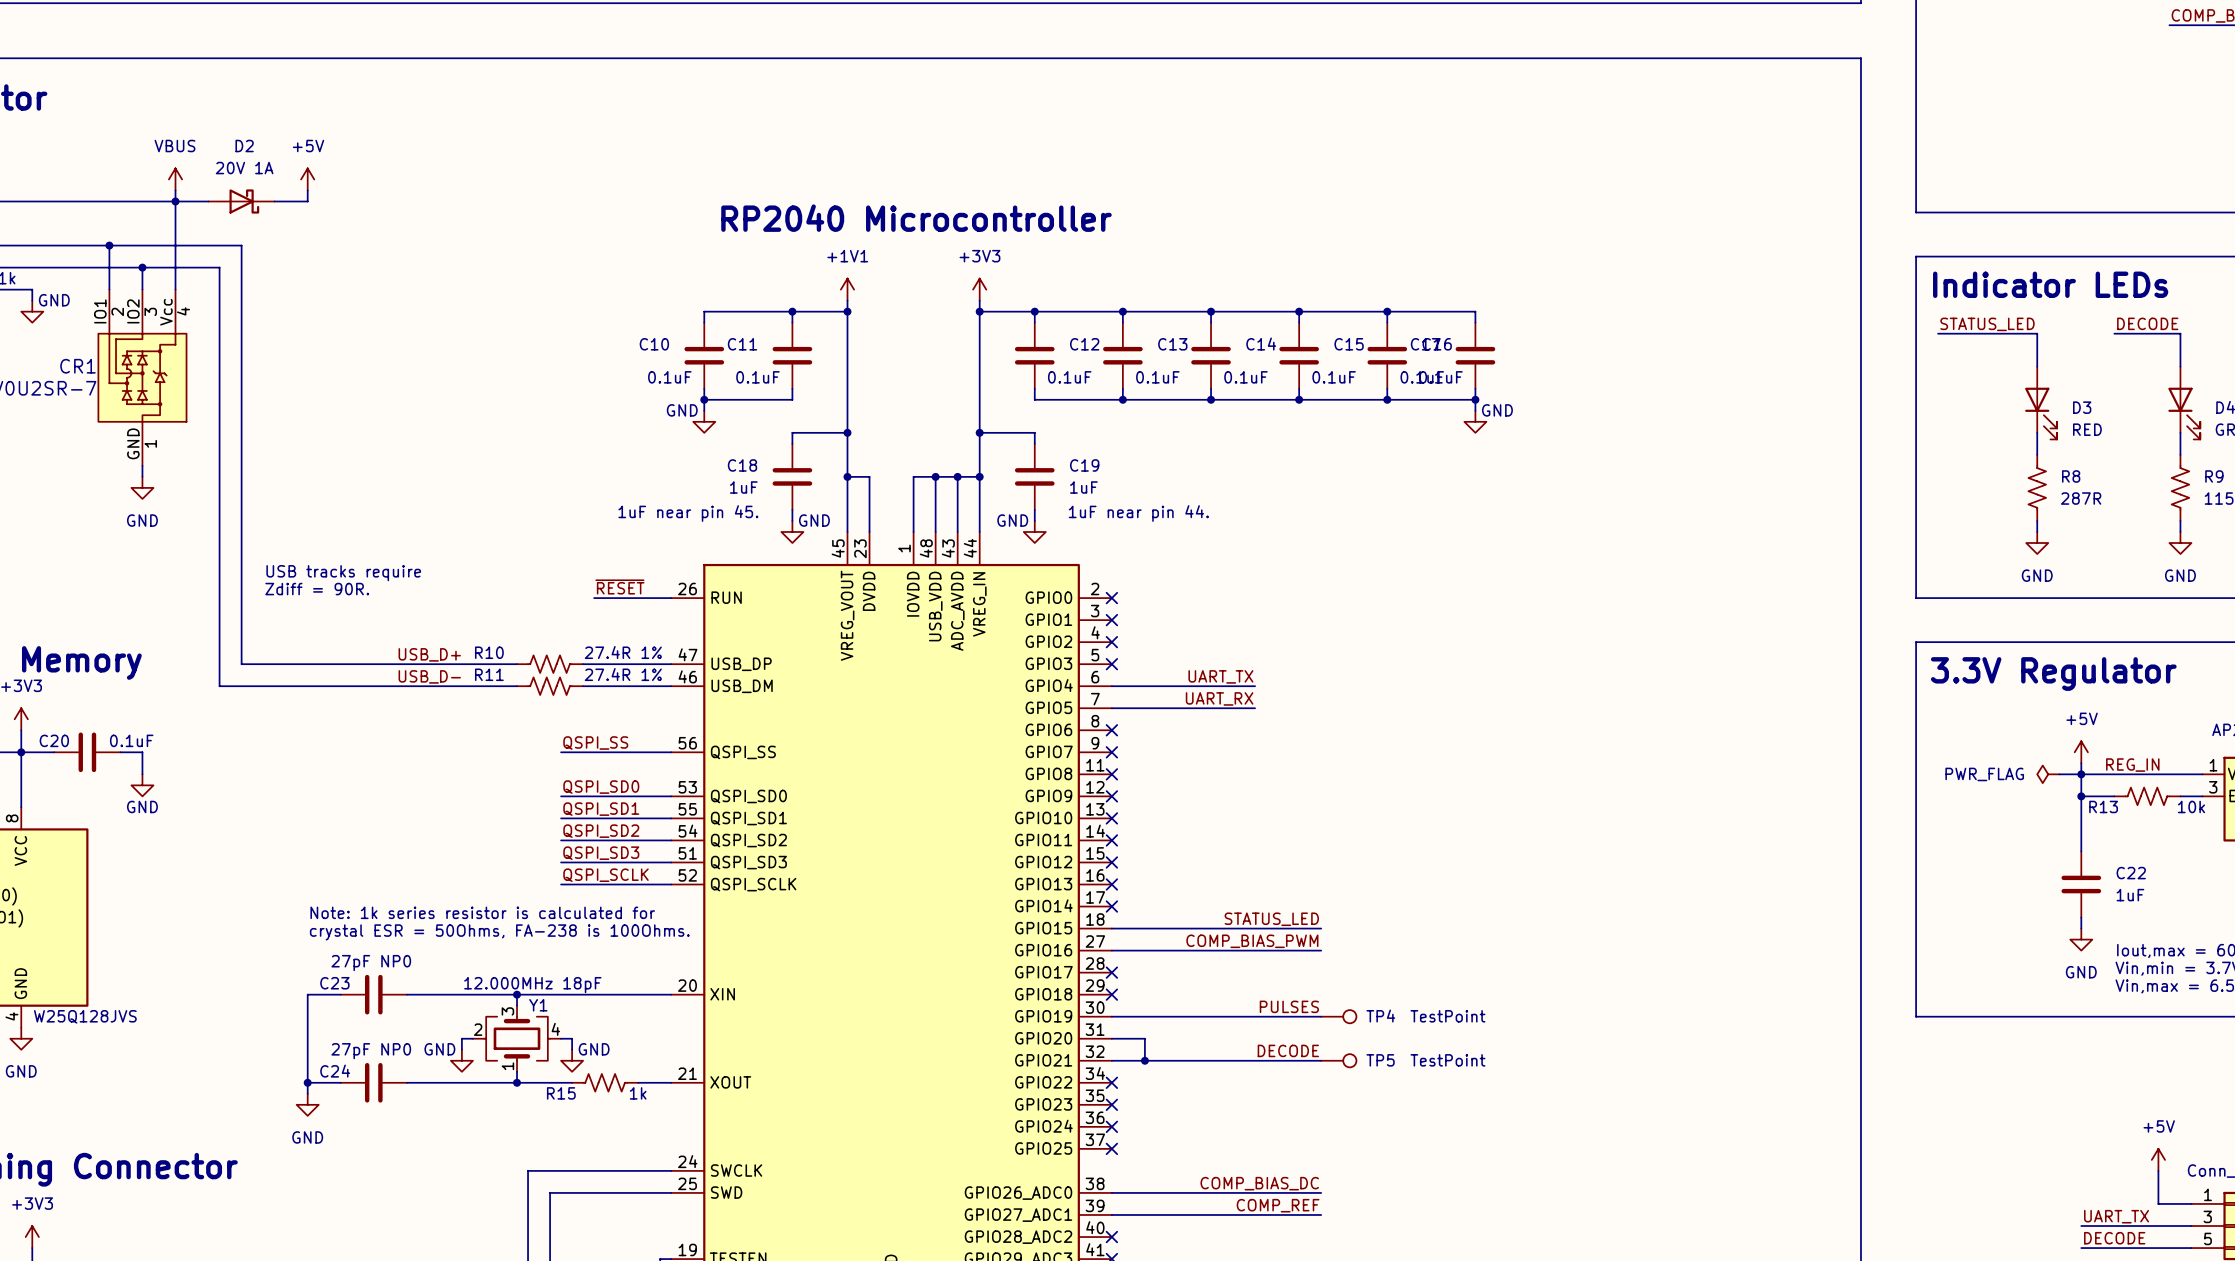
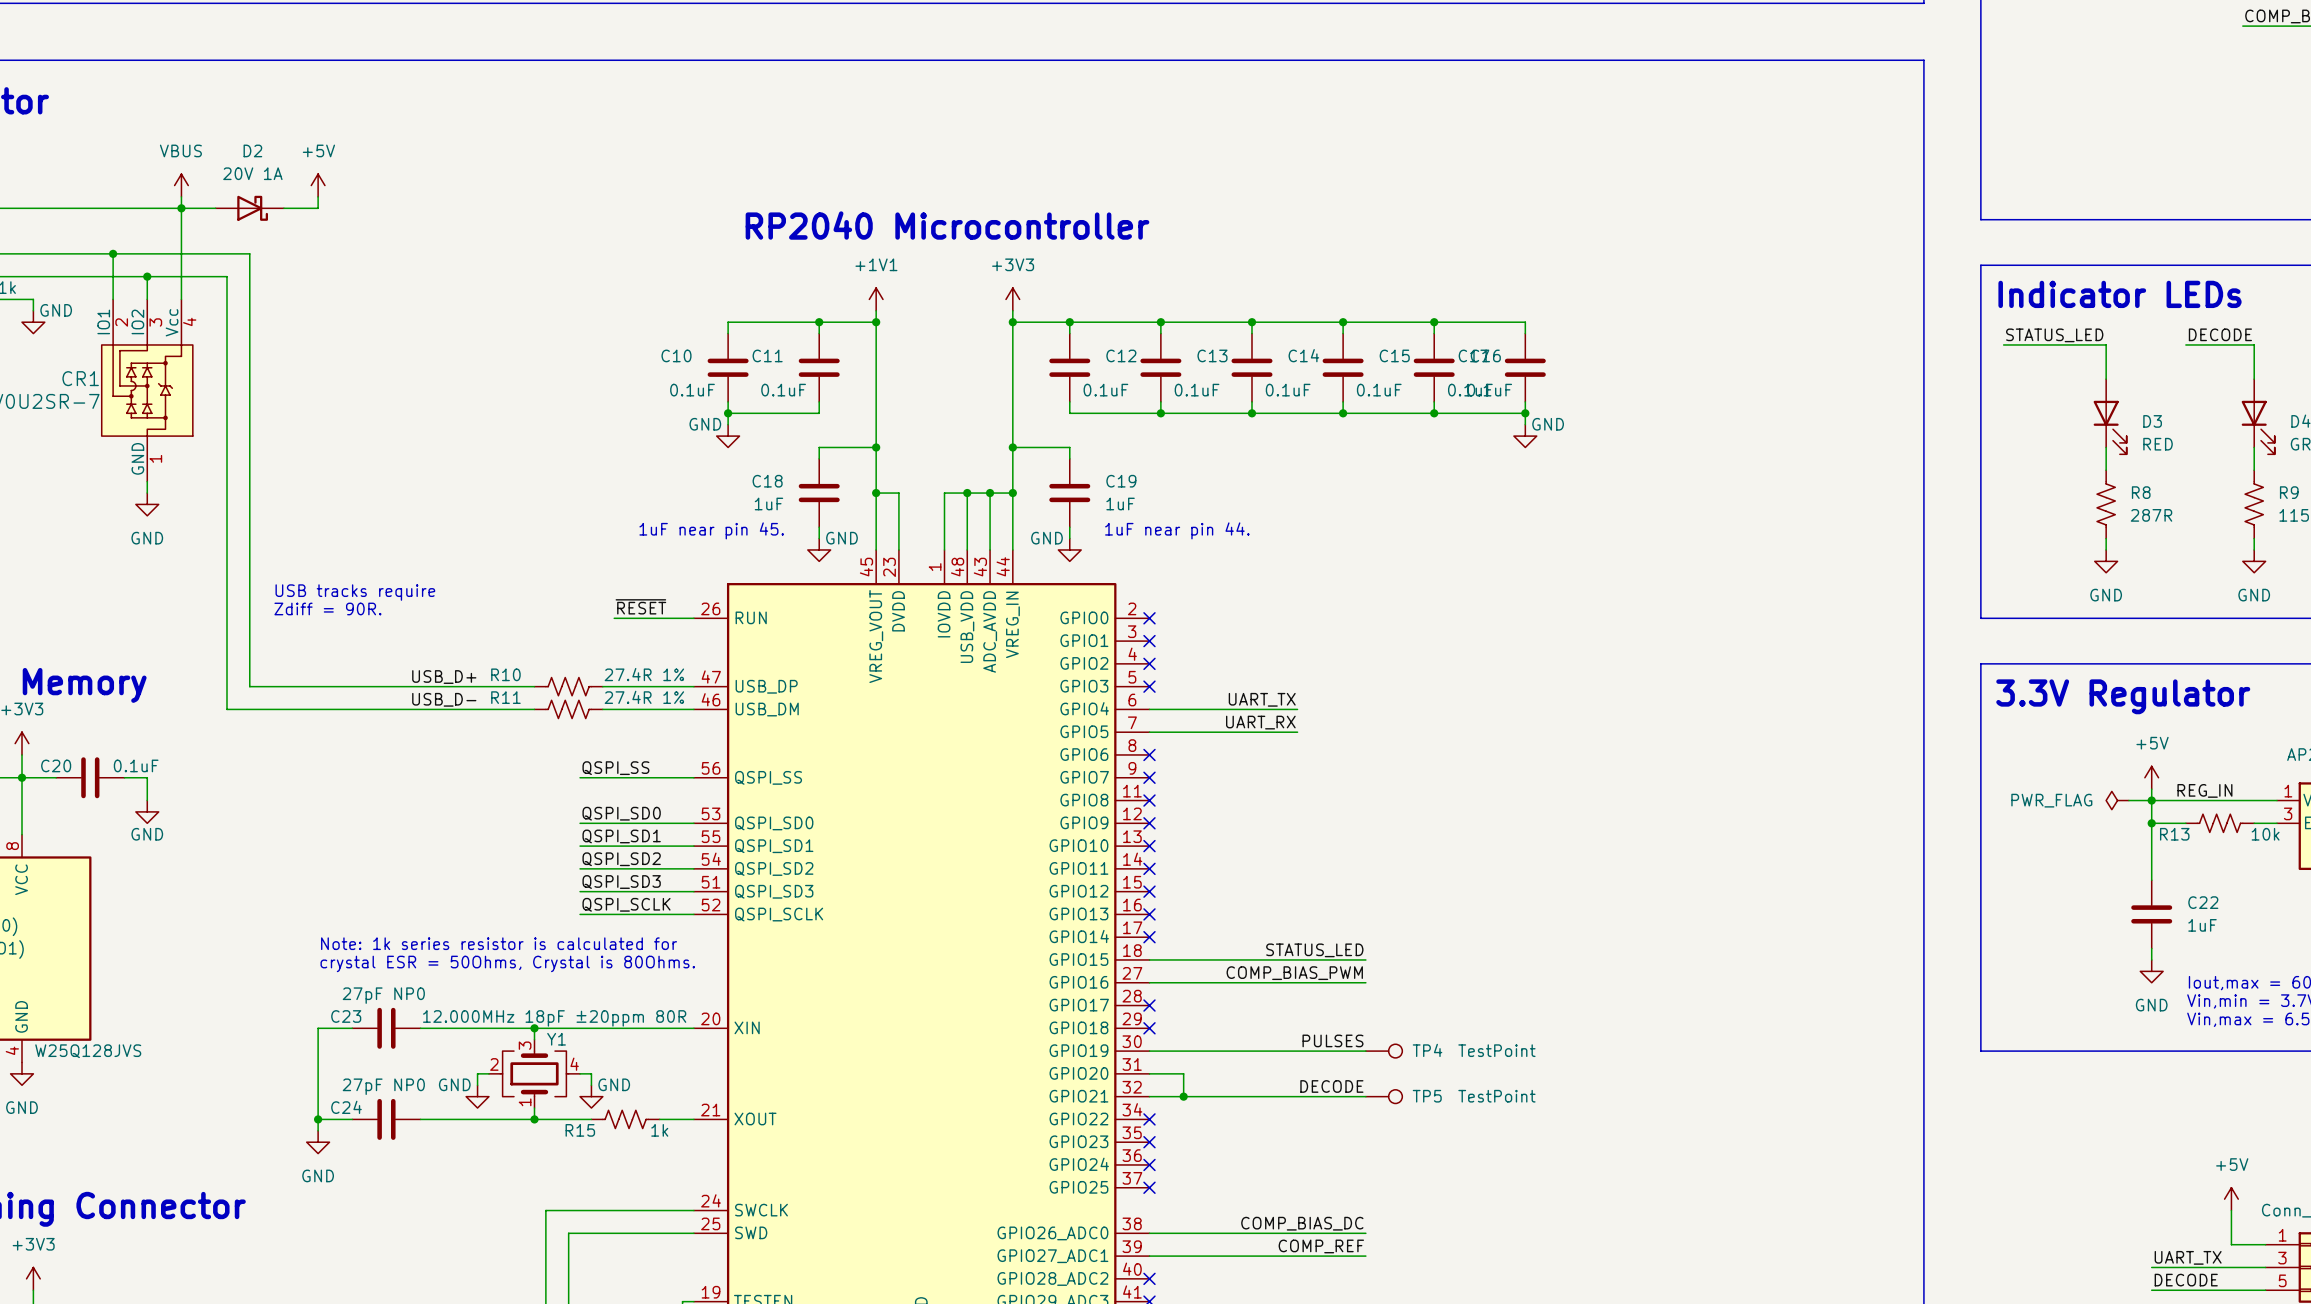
text: crystal ESR = 50Ohms, FA-238 is 100Ohms. (499, 932) -> crystal ESR = 50Ohms, Crystal is 80Ohms. (507, 963)
Y1 value: 12.000MHz 18pF (532, 985) -> 12.000MHz 18pF ±20ppm 80R (554, 1018)

